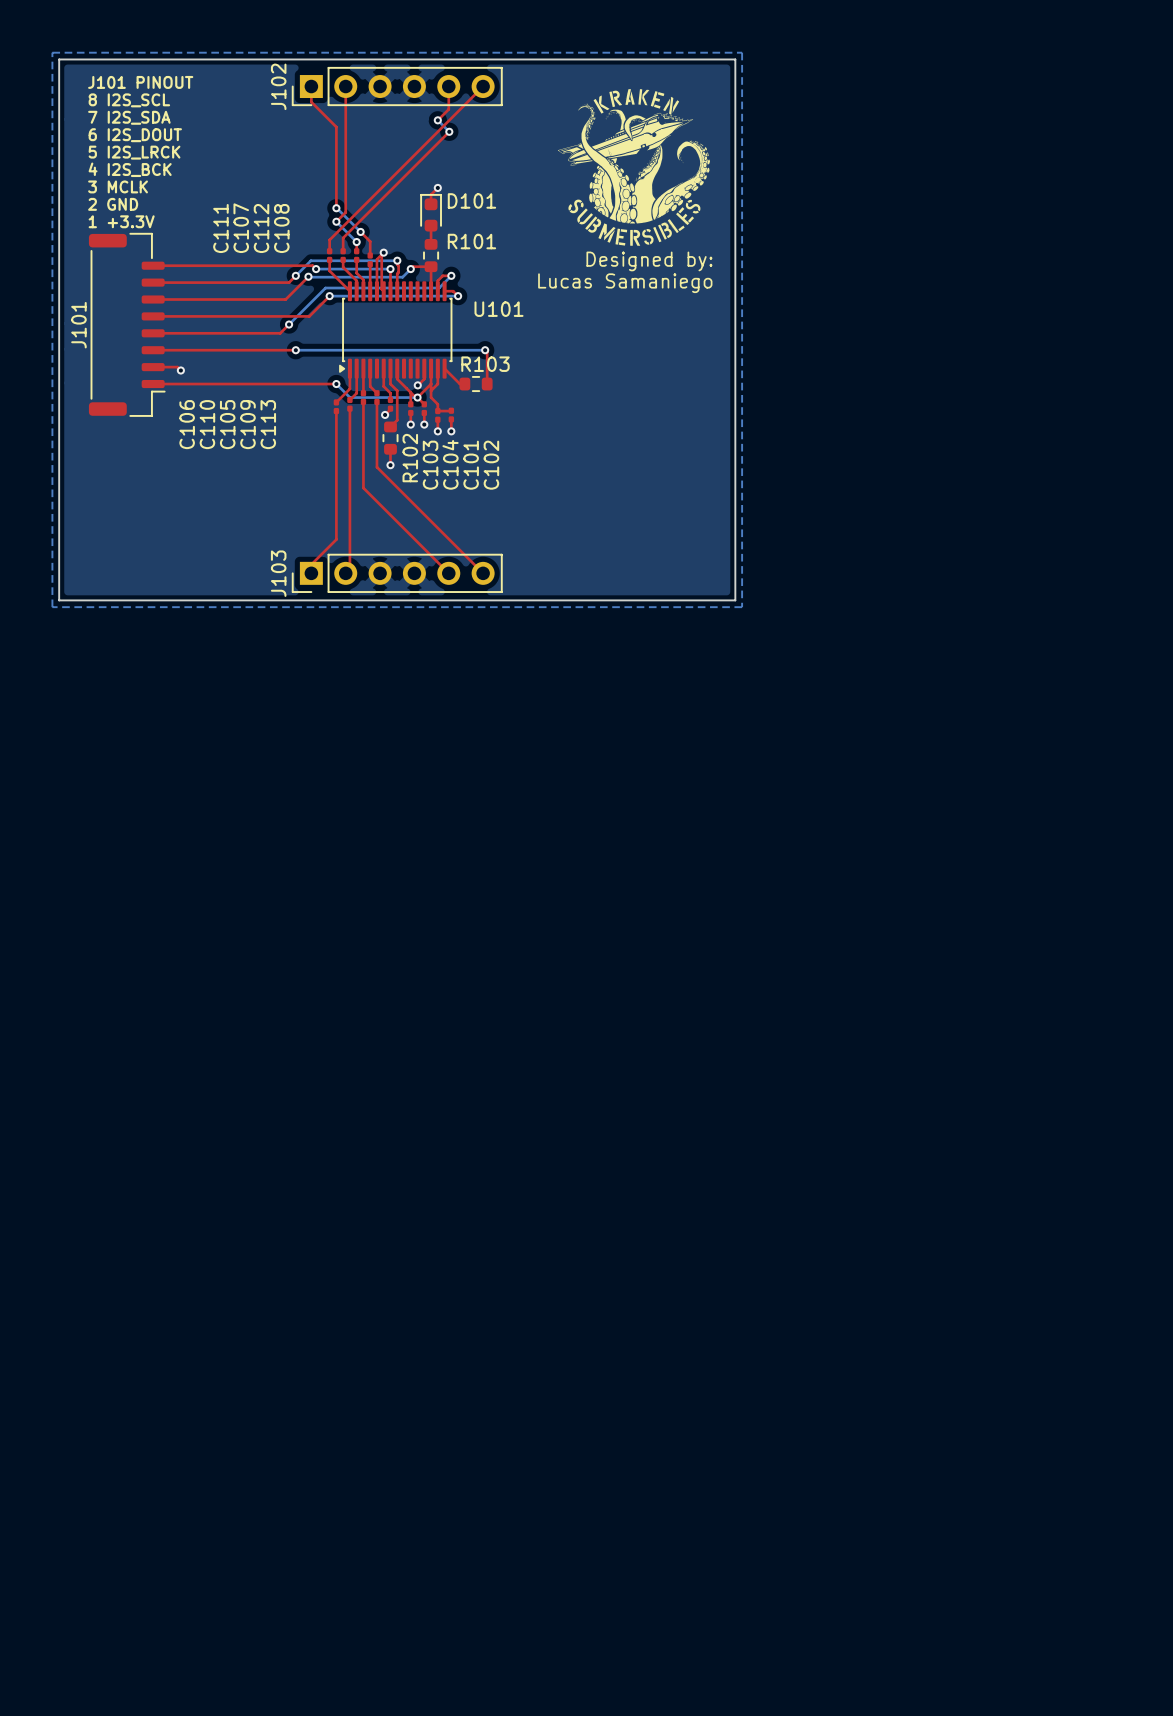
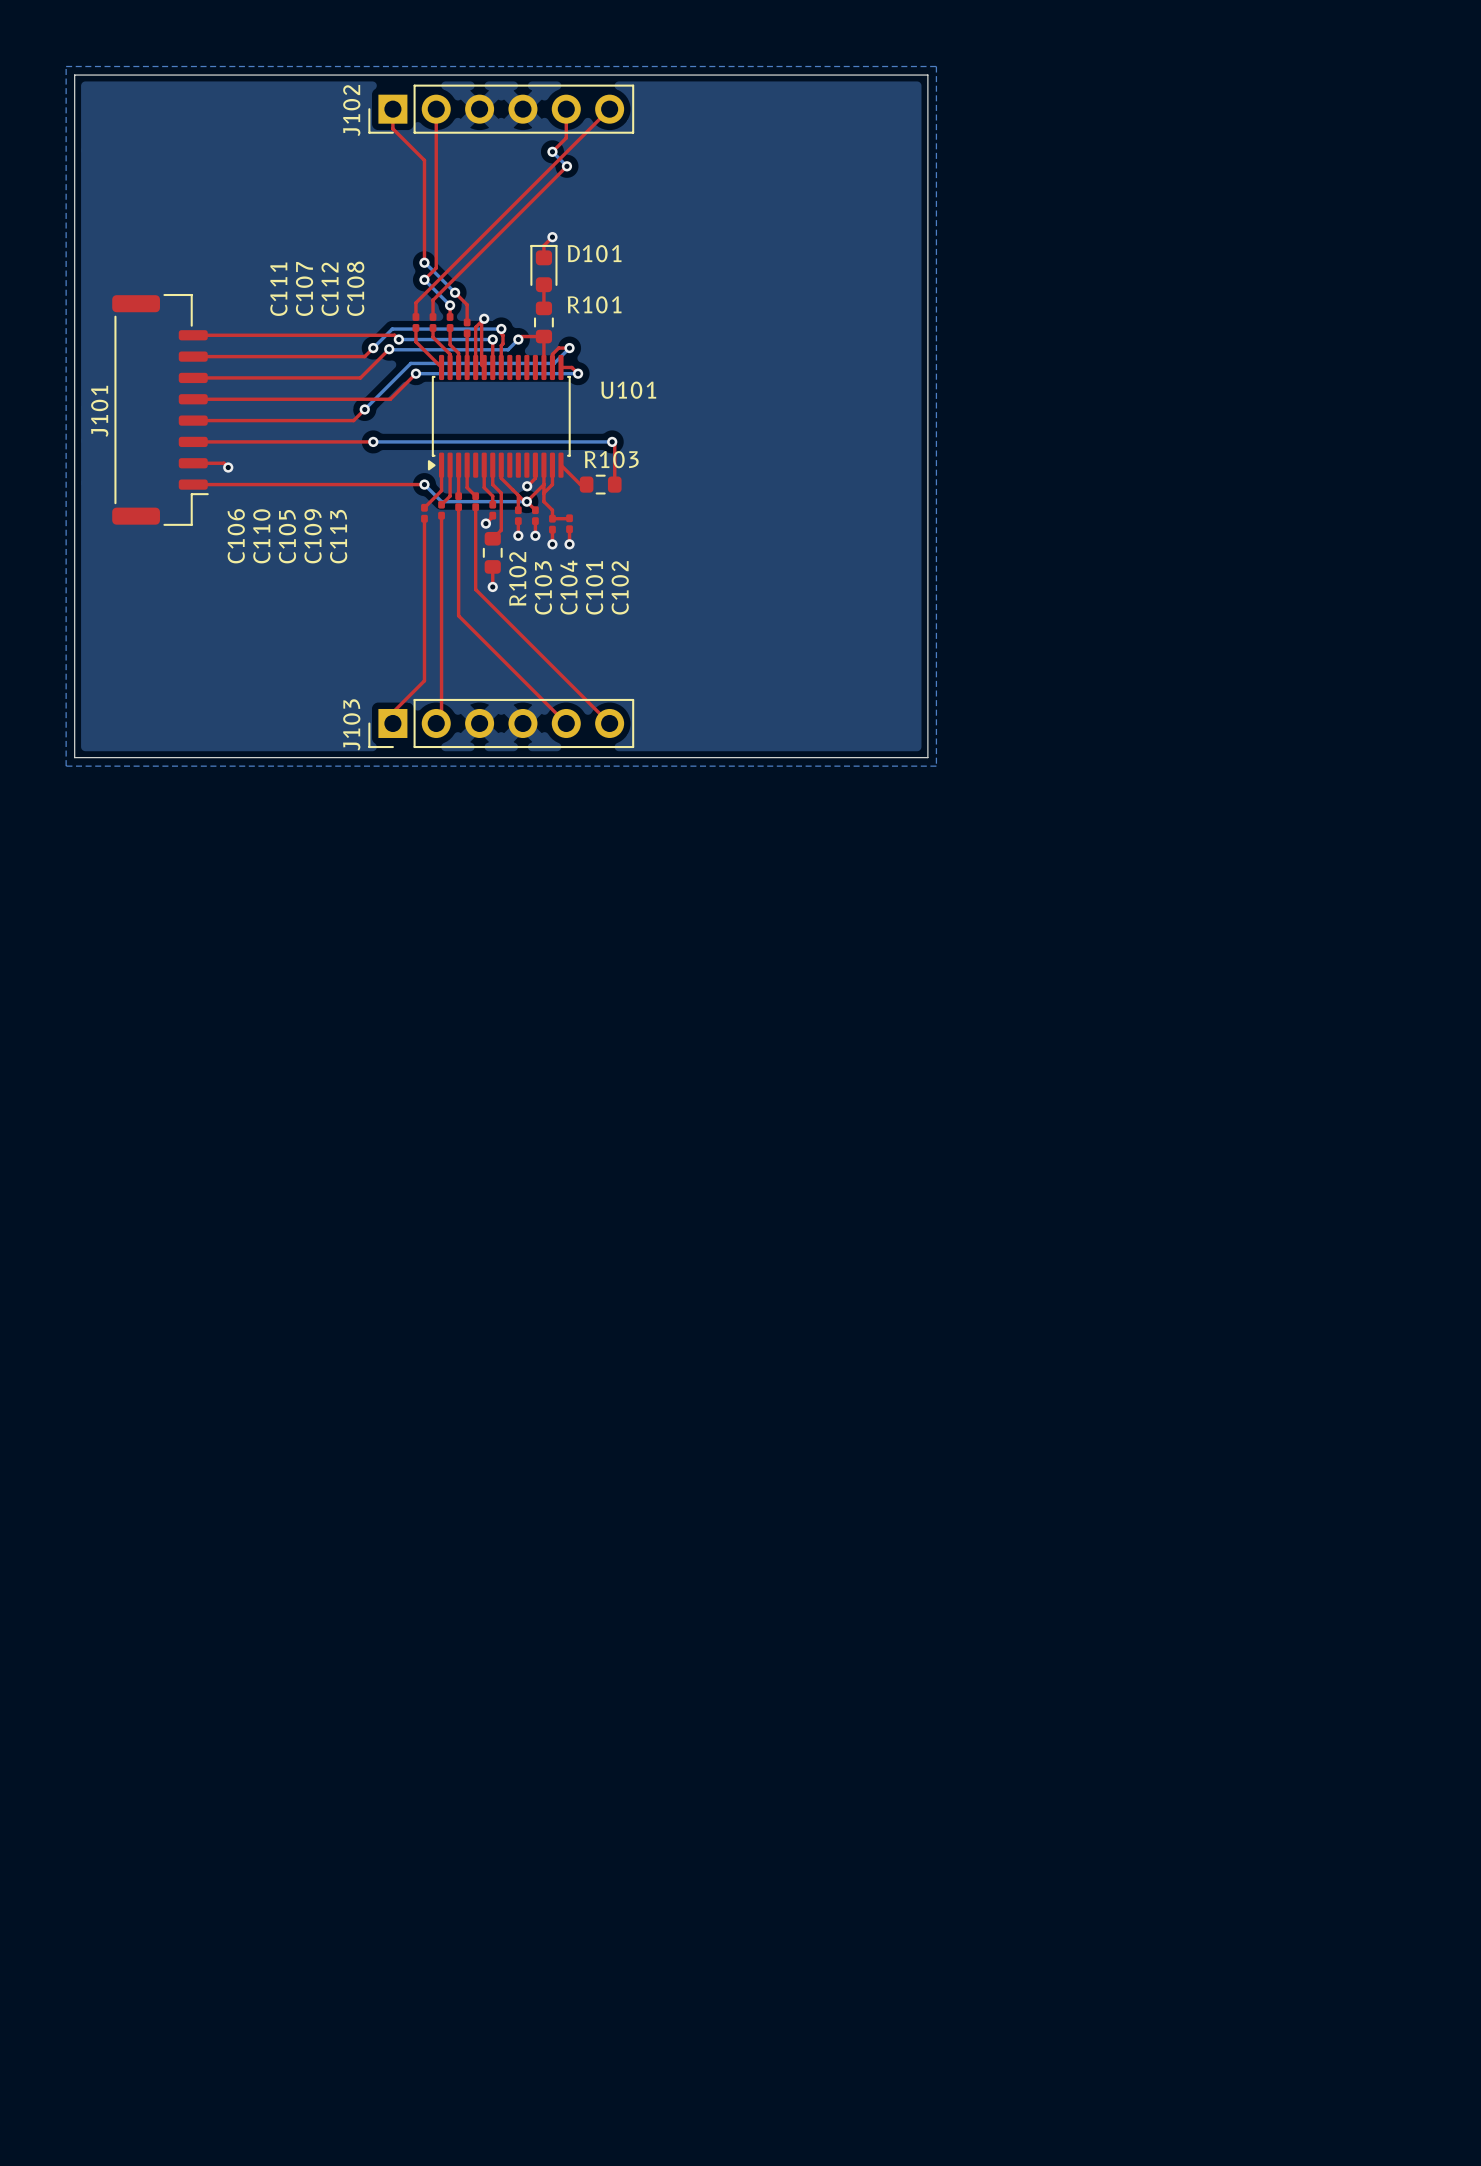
text: J101 PINOUT (140, 82) -> none
drawing: [557, 89, 710, 246] -> none
text: 8 I2S_SCL (129, 100) -> none
text: 7 I2S_SDA (129, 117) -> none
text: 6 I2S_DOUT (135, 135) -> none
text: 5 I2S_LRCK (134, 152) -> none
text: 4 I2S_BCK (130, 169) -> none
text: 3 MCLK (118, 186) -> none
text: 2 GND (113, 204) -> none
text: 1 +3.3V (121, 221) -> none
text: Designed by: (649, 261) -> none
text: Lucas Samaniego (625, 283) -> none

